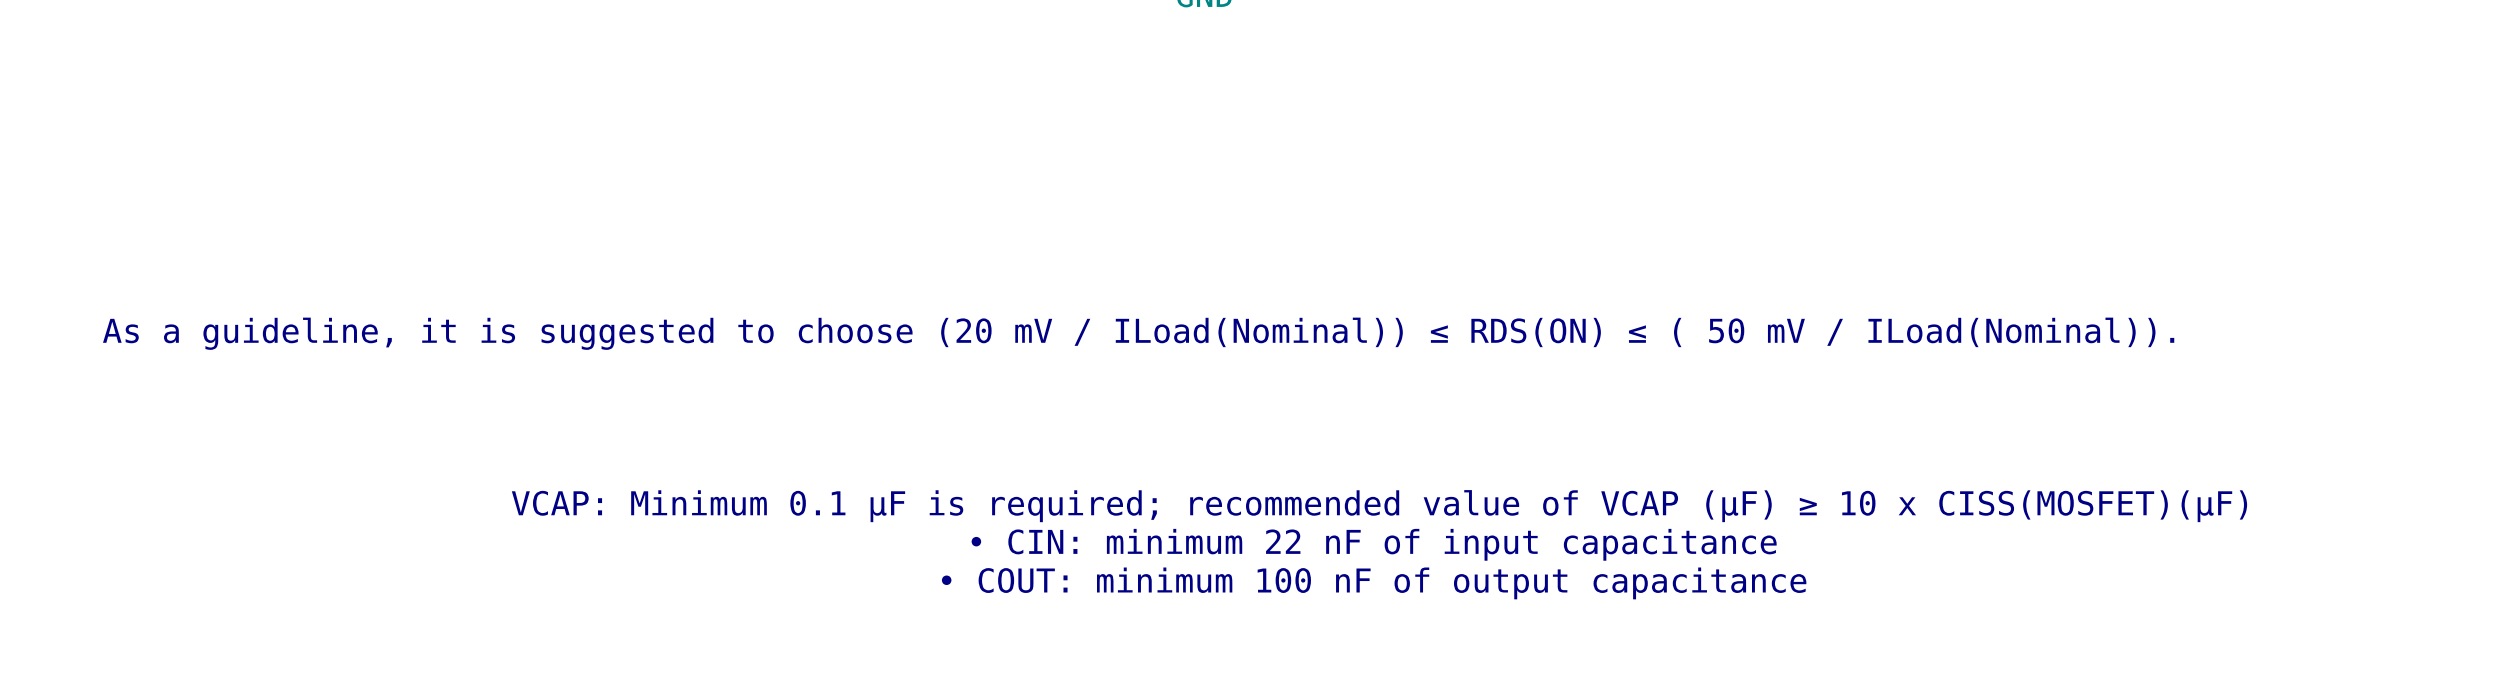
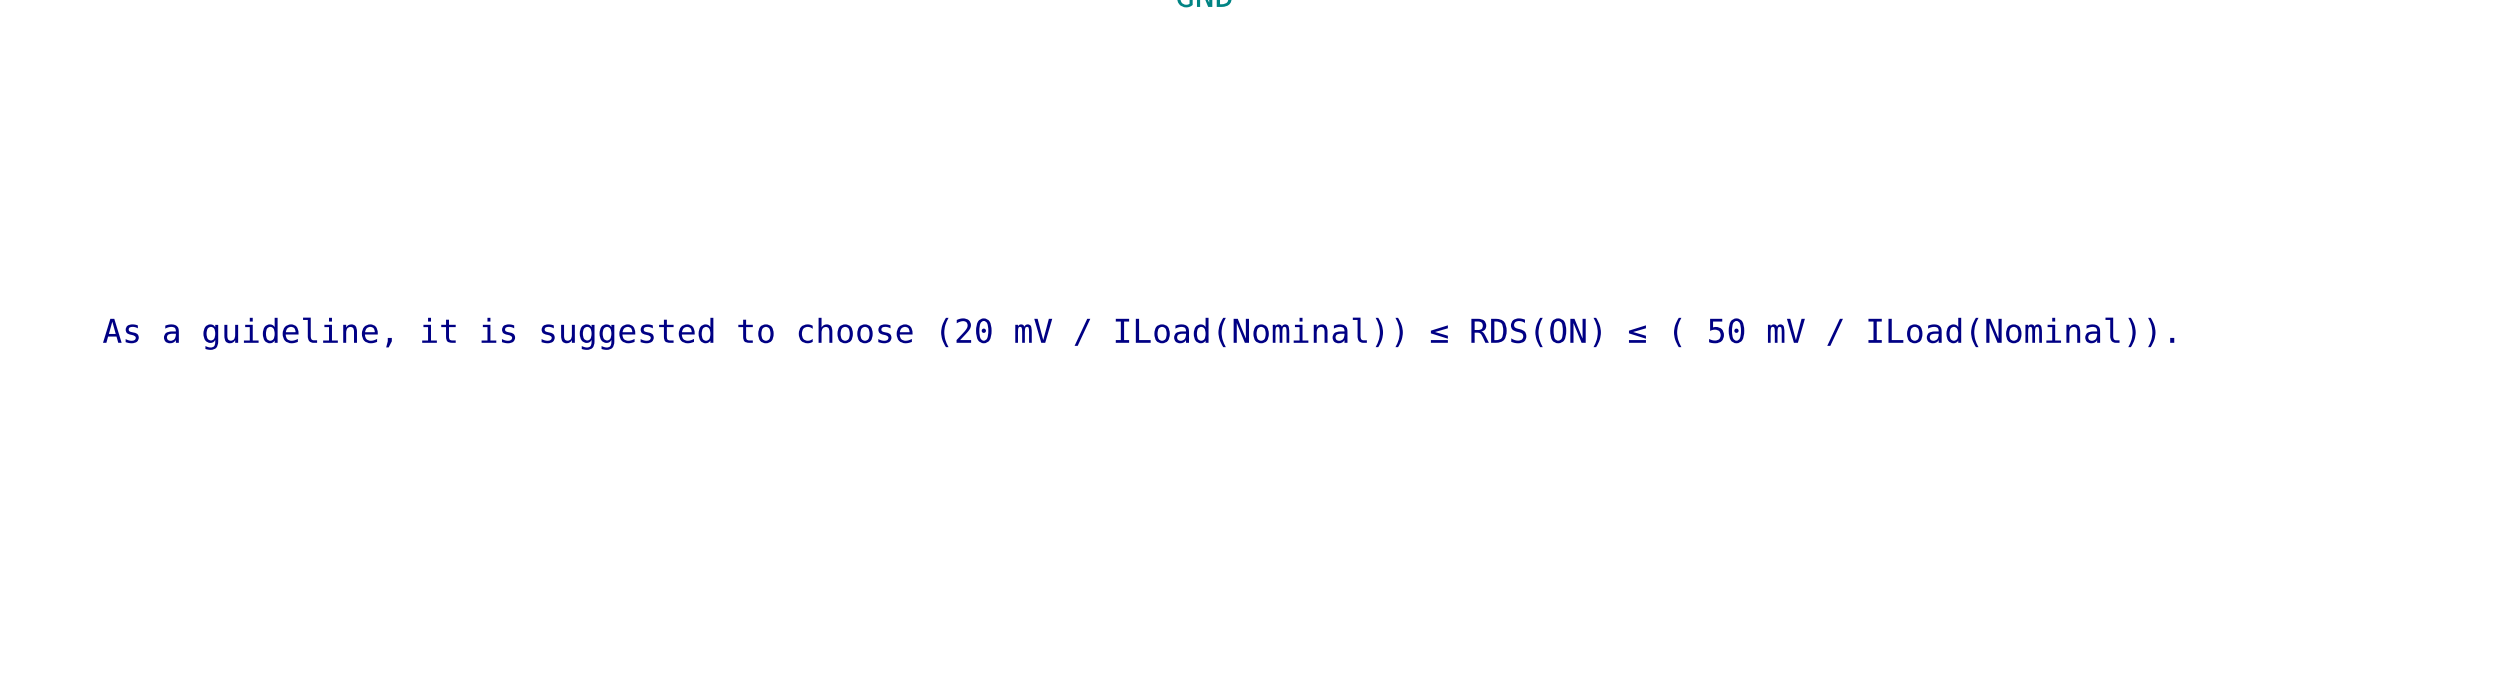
text: VCAP: Minimum 0.1 µF is required; recommended value of VCAP (µF) ≥ 10 x CISS(MOSFET)(µF) (1379, 506) -> none
text: • CIN: minimum 22 nF of input capacitance (1374, 544) -> none
text: • COUT: minimum 100 nF of output capacitance (1374, 583) -> none

